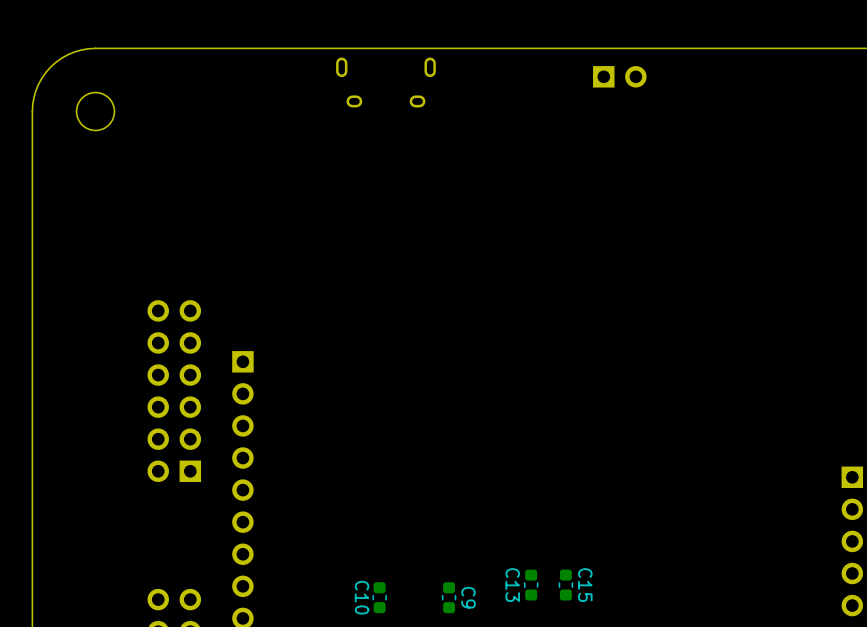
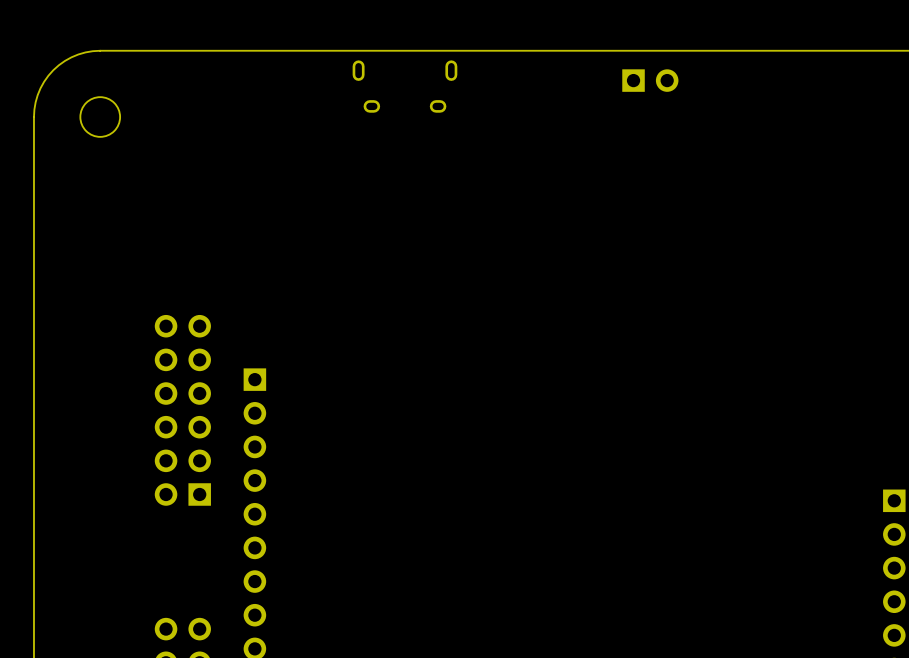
C13: (531, 585) -> none
C15: (565, 585) -> none
C10: (379, 597) -> none
C9: (449, 597) -> none

